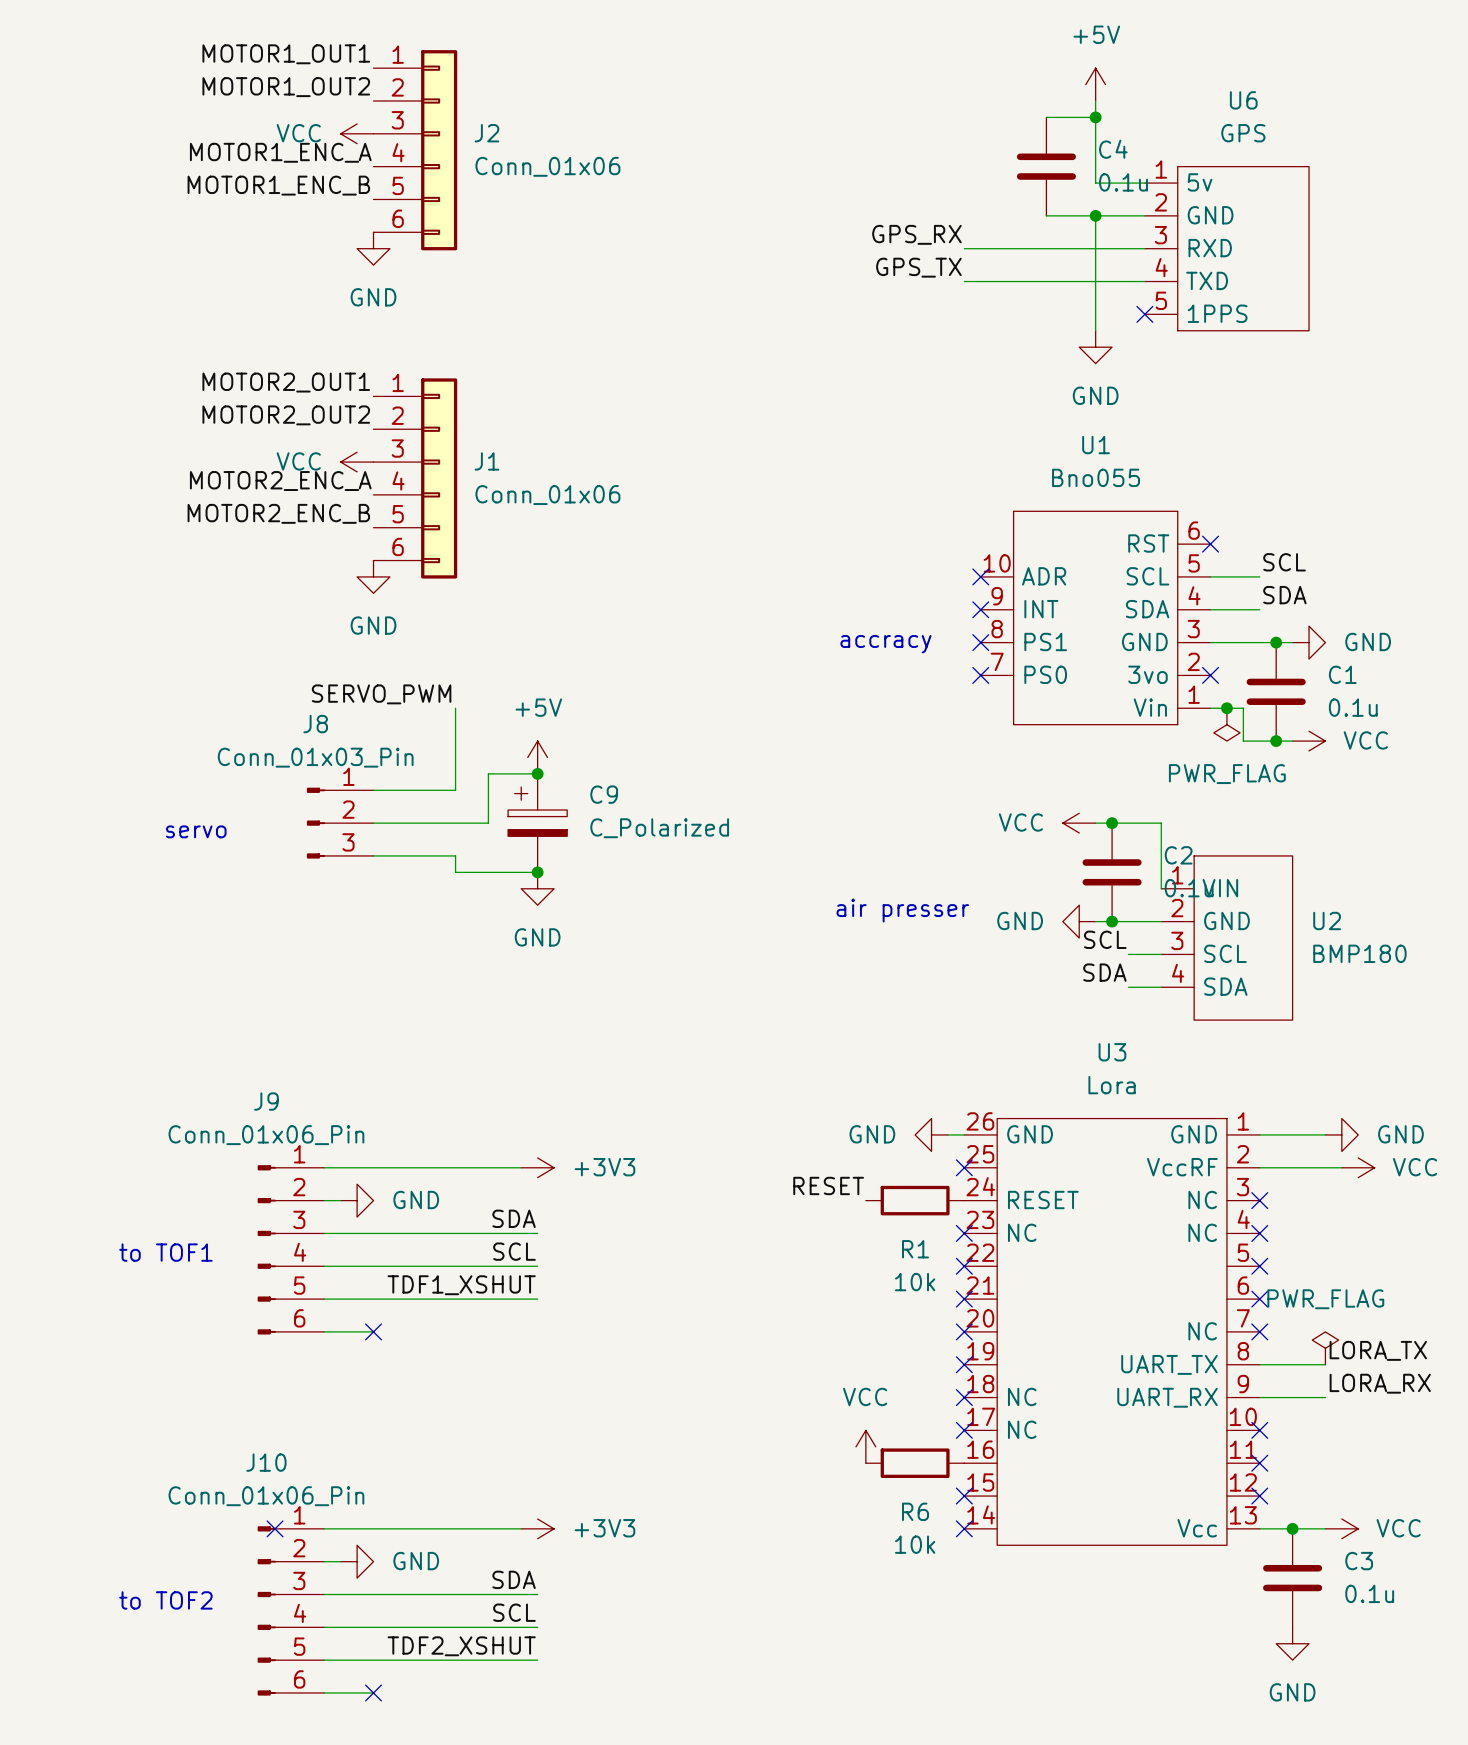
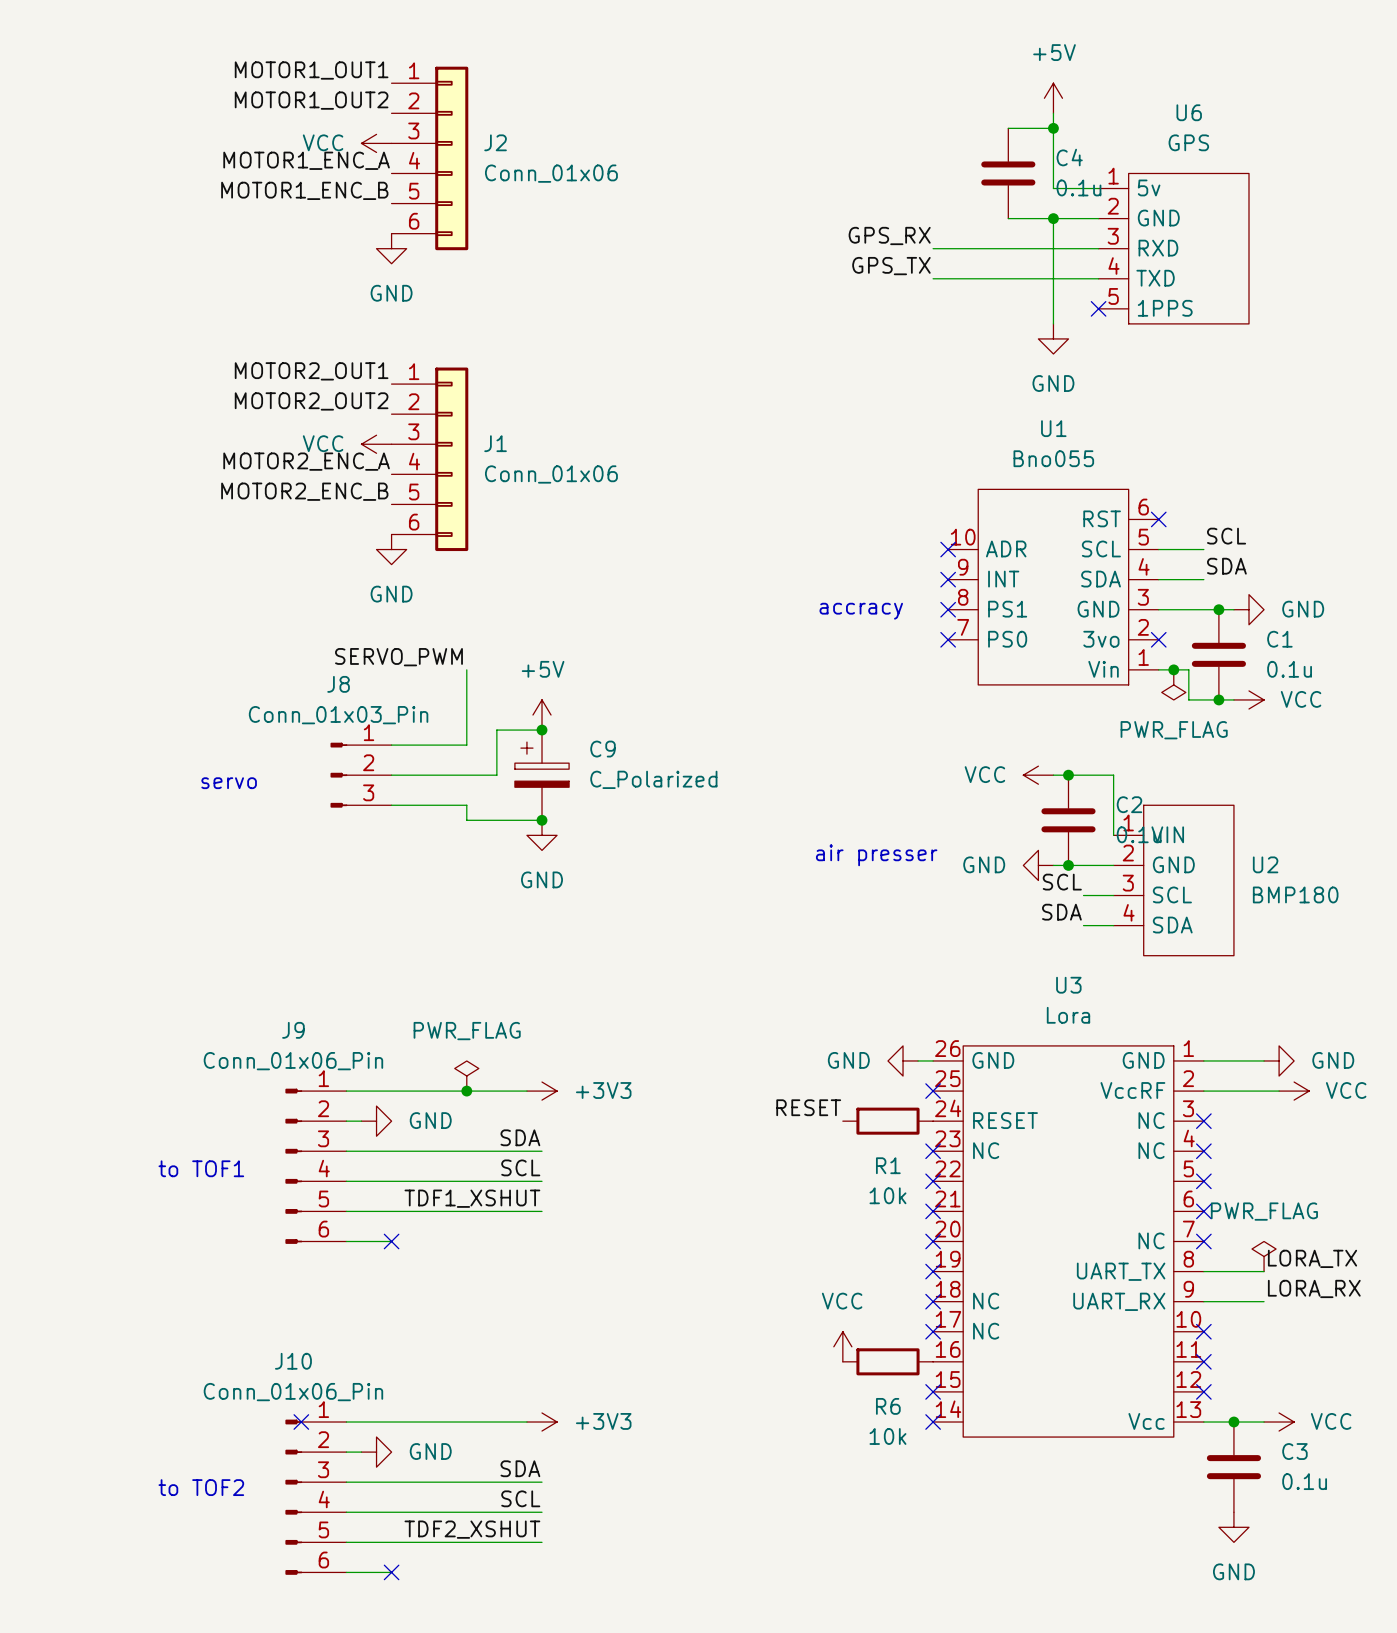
power symbol: none -> PWR_FLAG (466, 1076)
junction: none -> (466, 1091)

